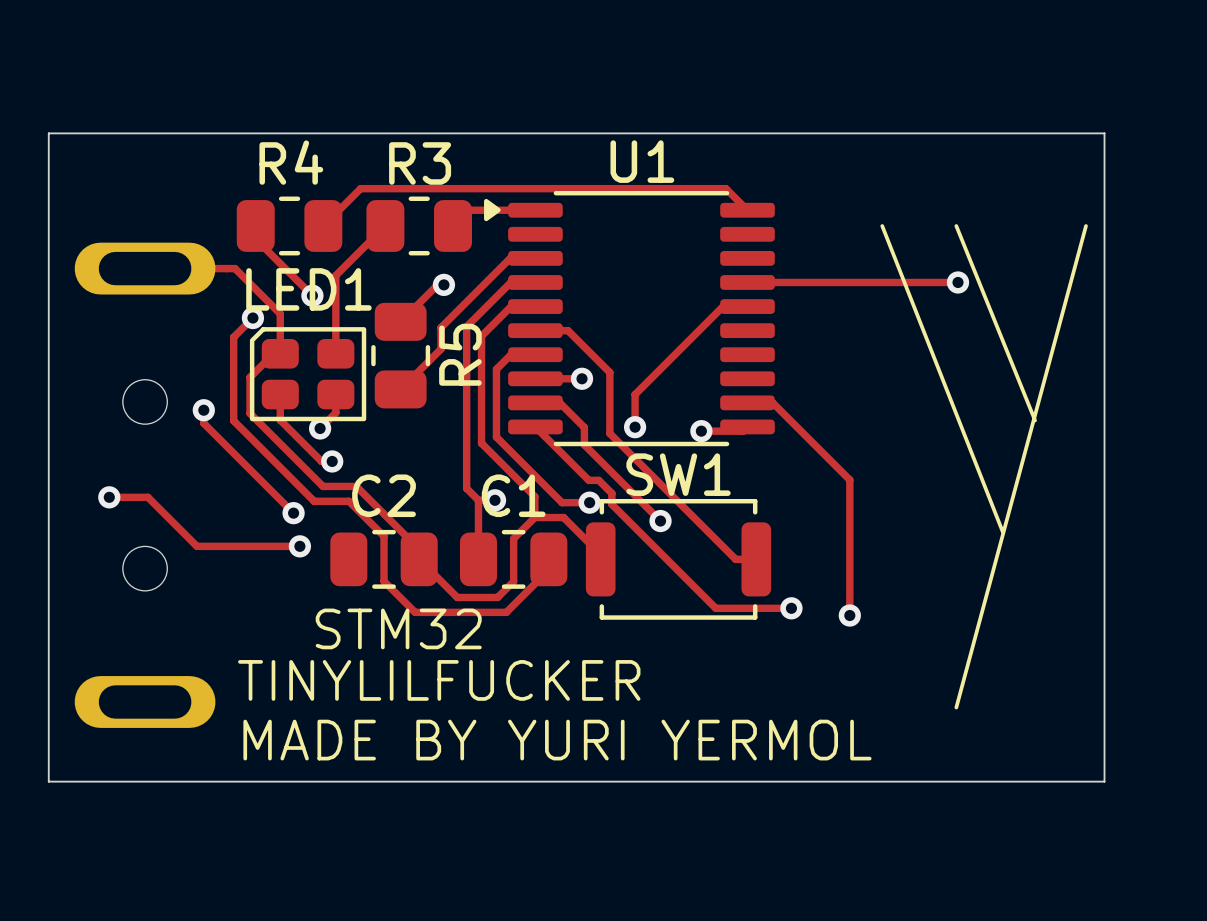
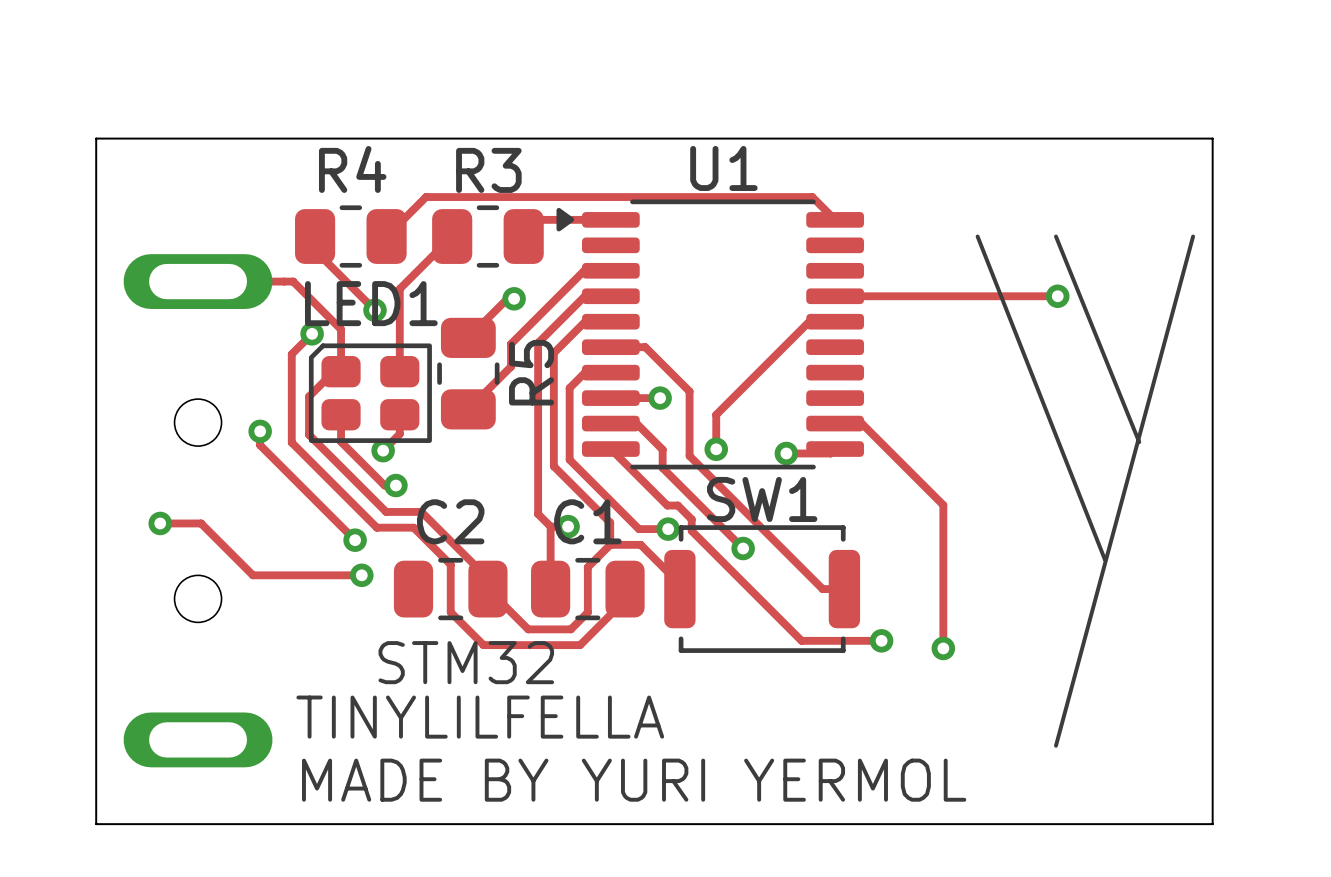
text: TINYLILFUCKER (439, 680) -> TINYLILFELLA (480, 717)

